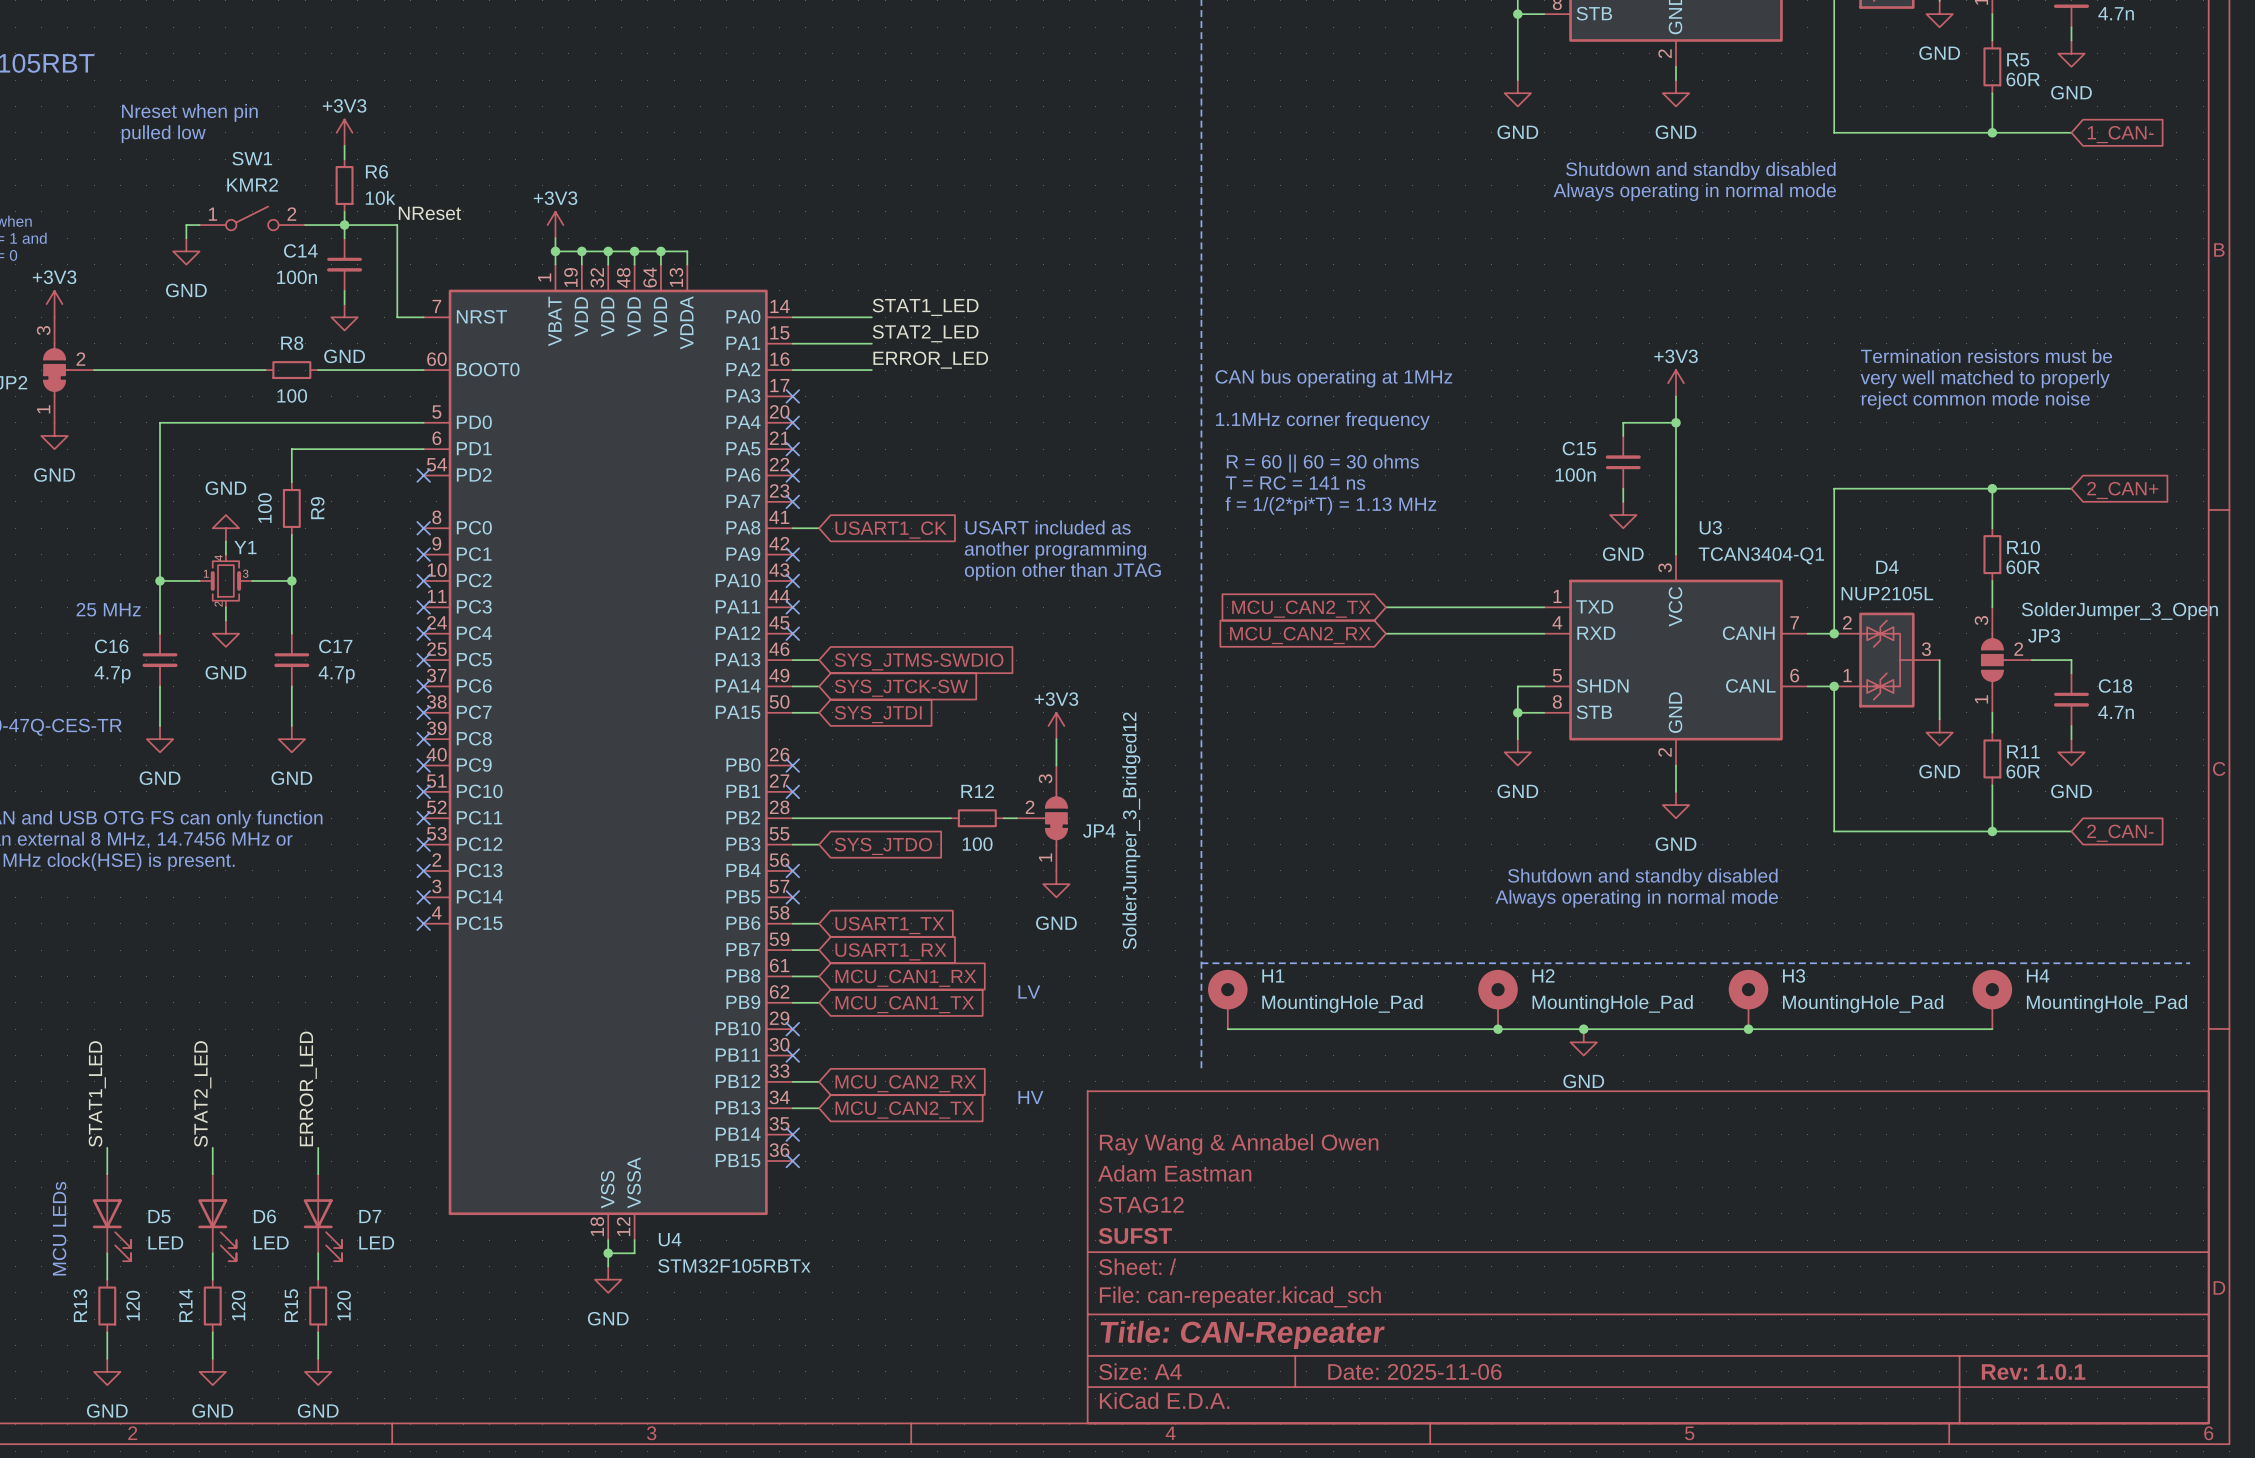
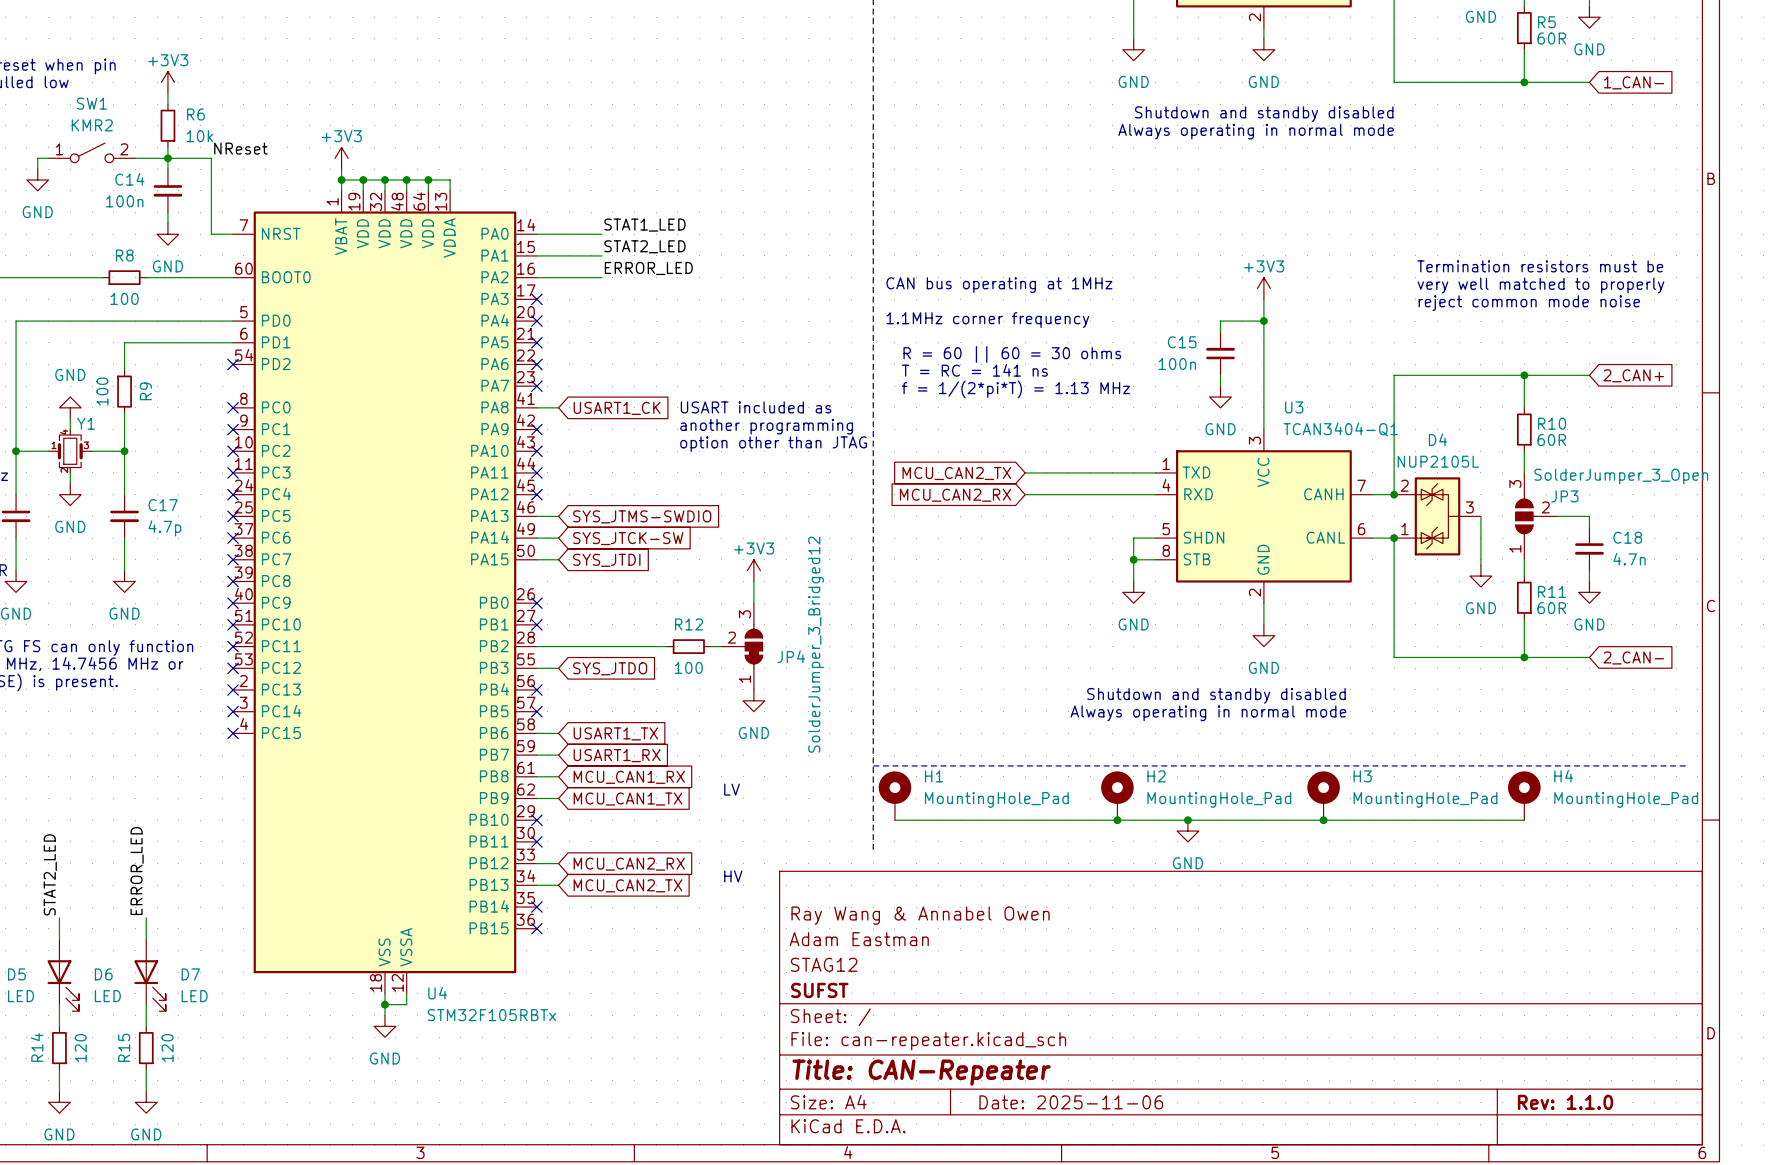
title block: Rev: 1.0.1 (2033, 1371) -> Rev: 1.1.0 (1565, 1102)

